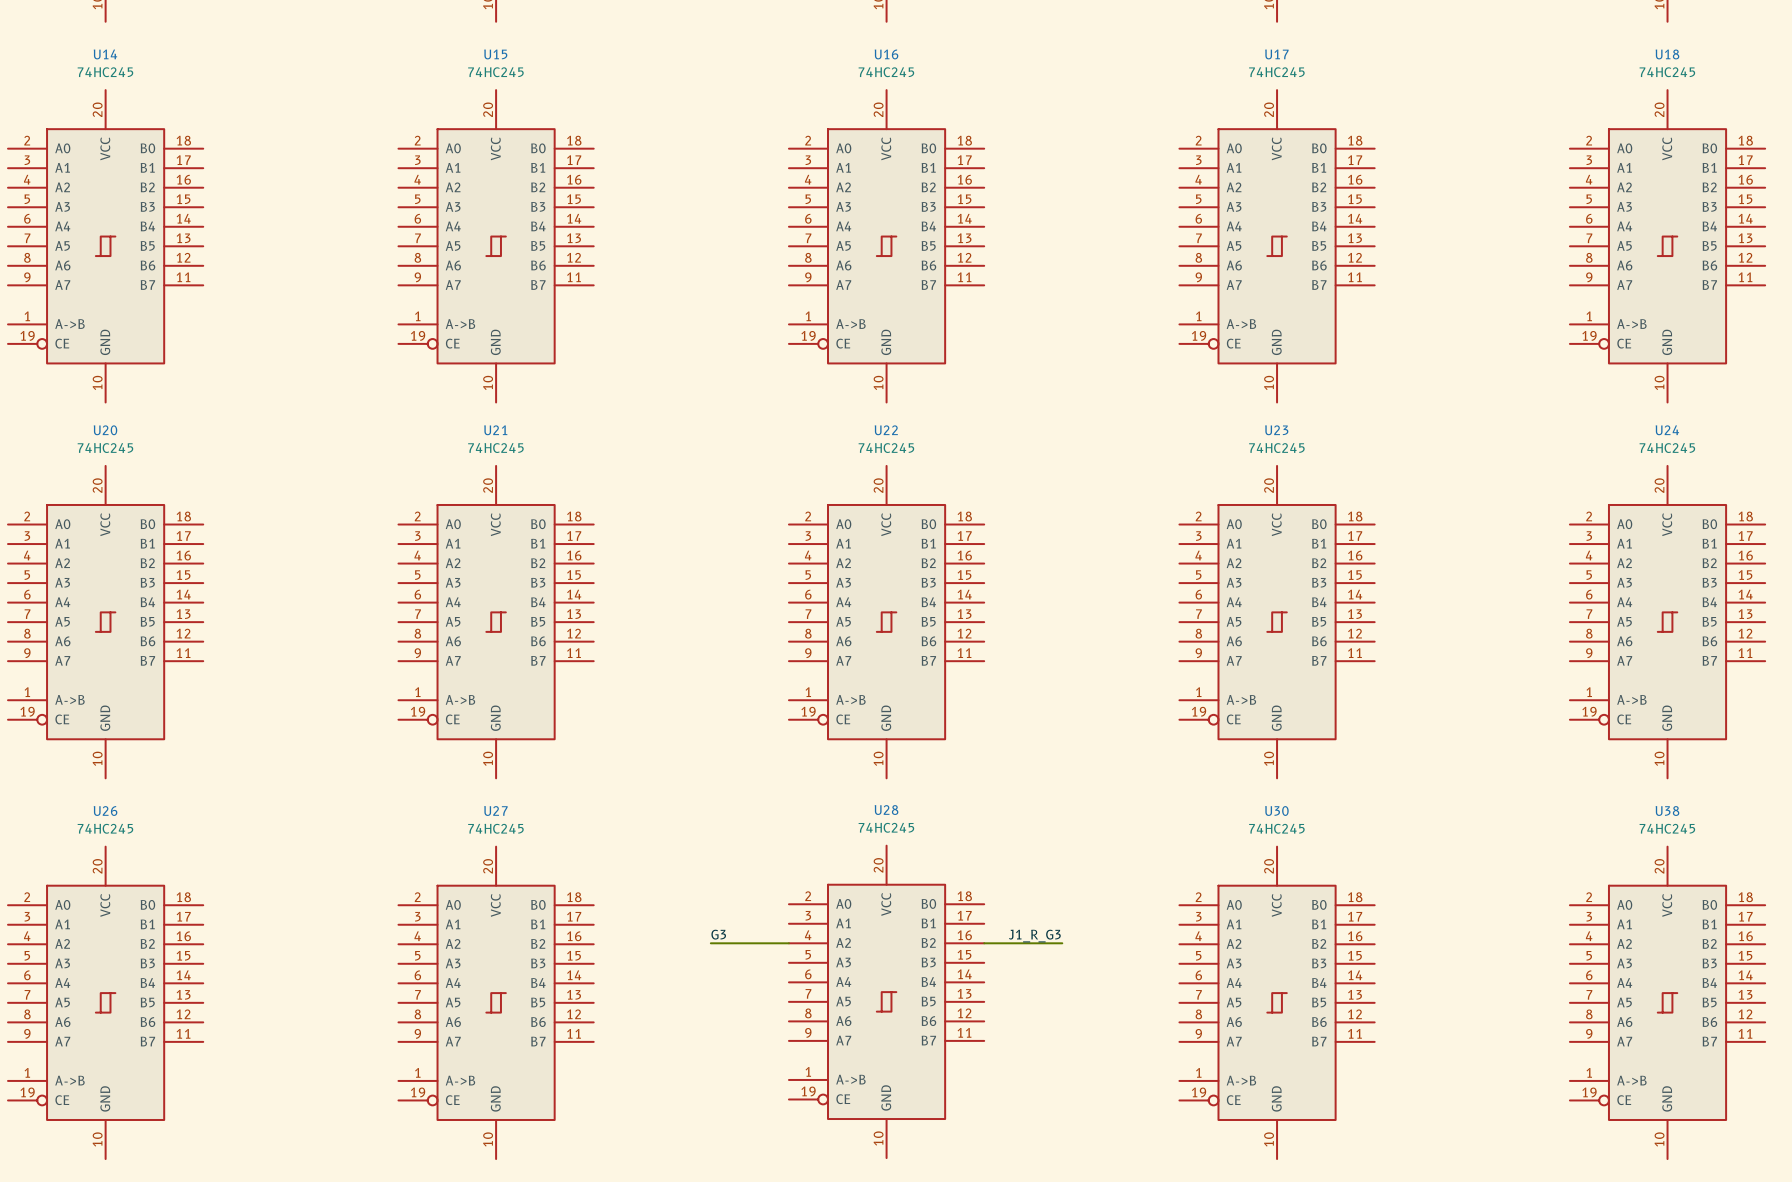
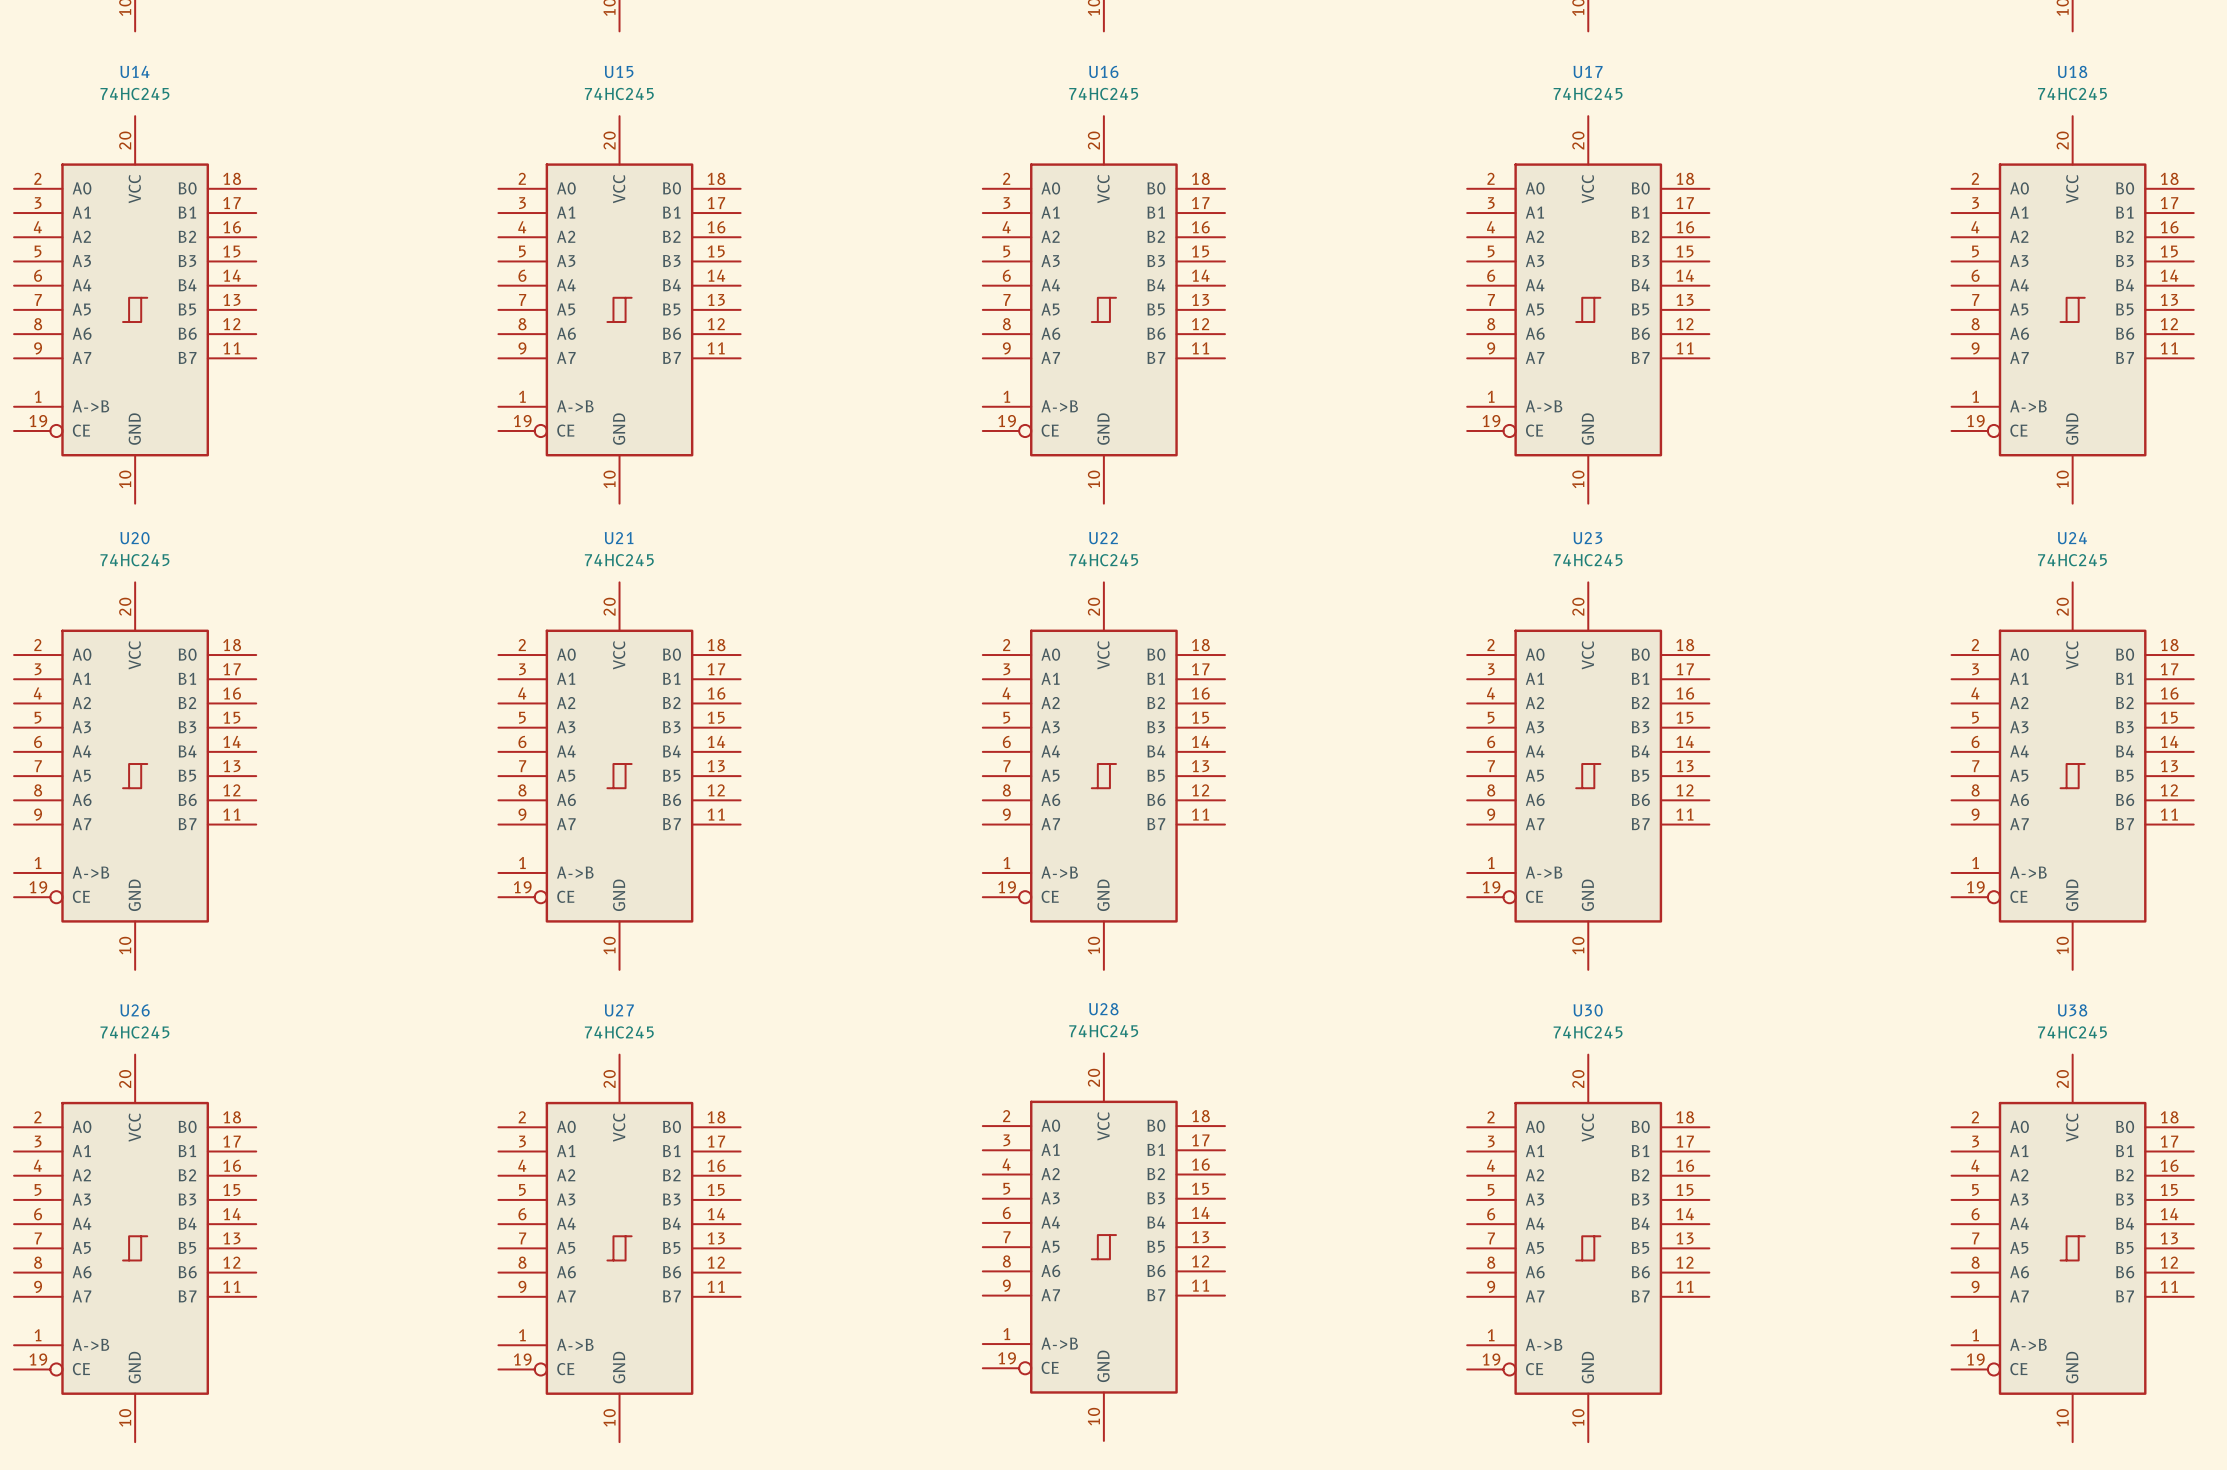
label: G3 (718, 934) -> none
label: J1_R_G3 (1034, 936) -> none
wire: (710, 943) (788, 943) -> none
wire: (984, 943) (1062, 943) -> none

